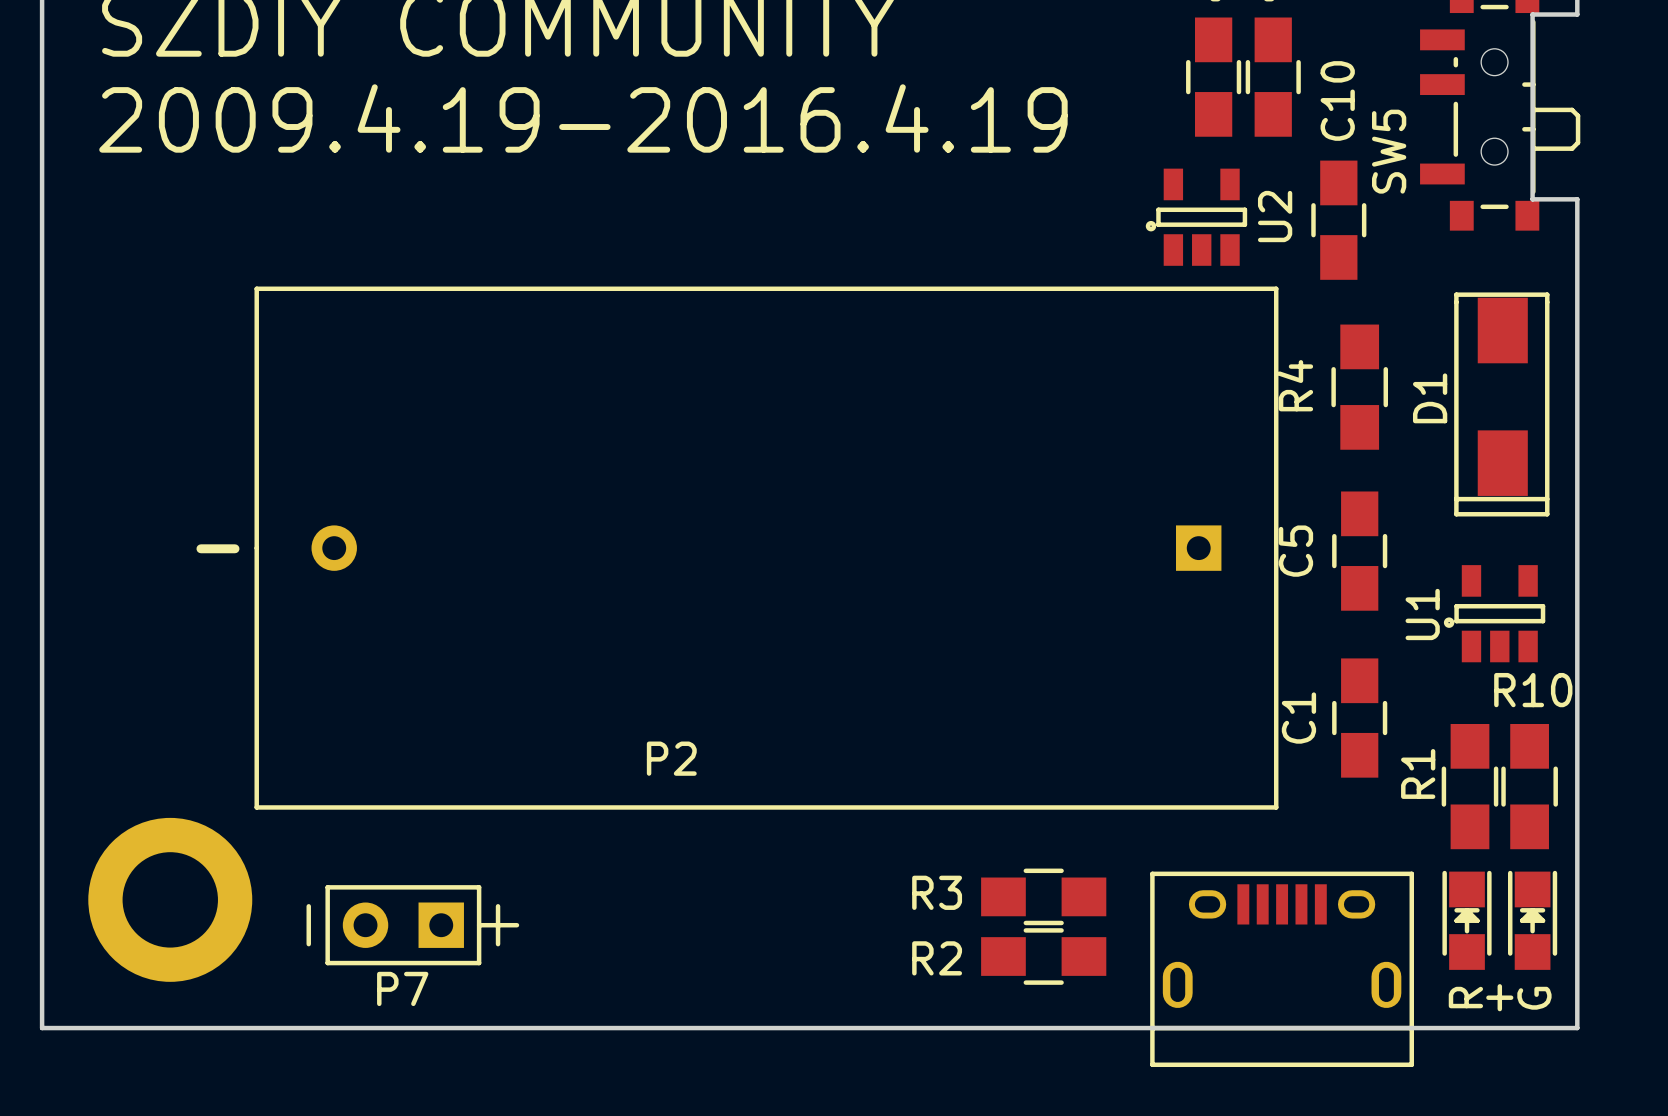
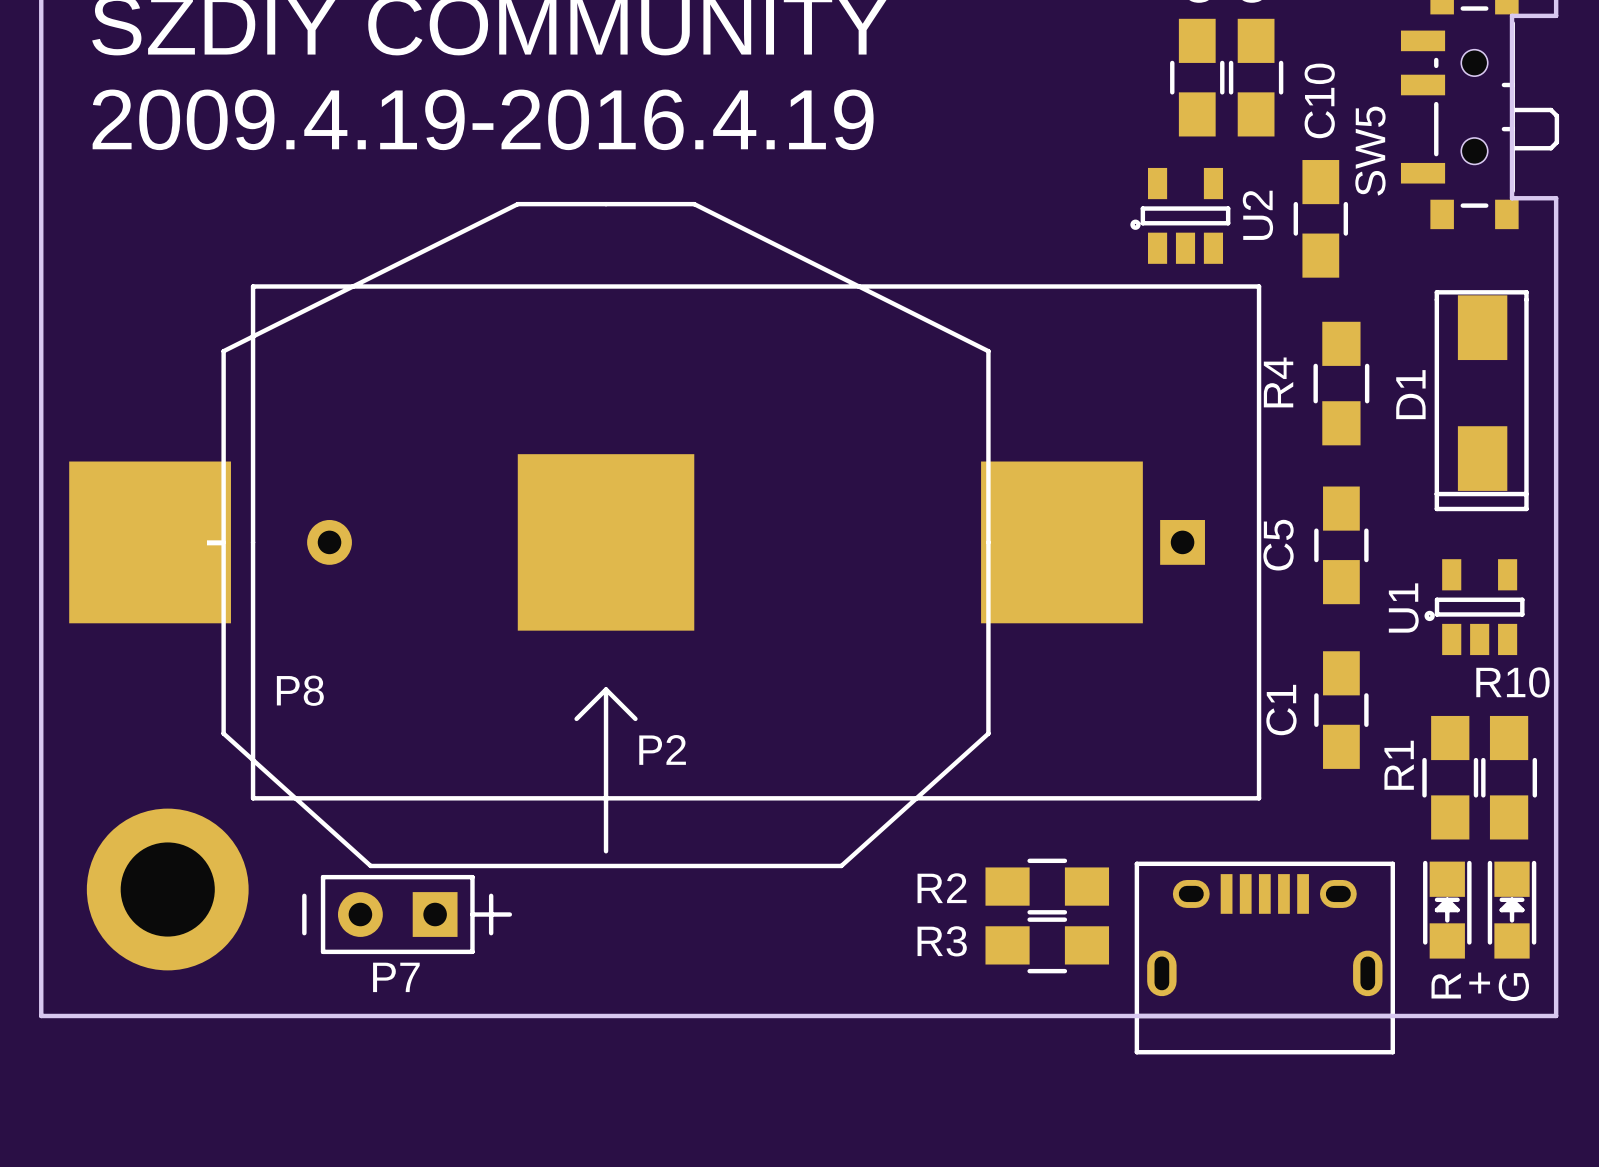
P8: none -> (606, 535)
R3 position: (1043, 896) -> (1047, 945)
R2 position: (1043, 956) -> (1047, 886)

